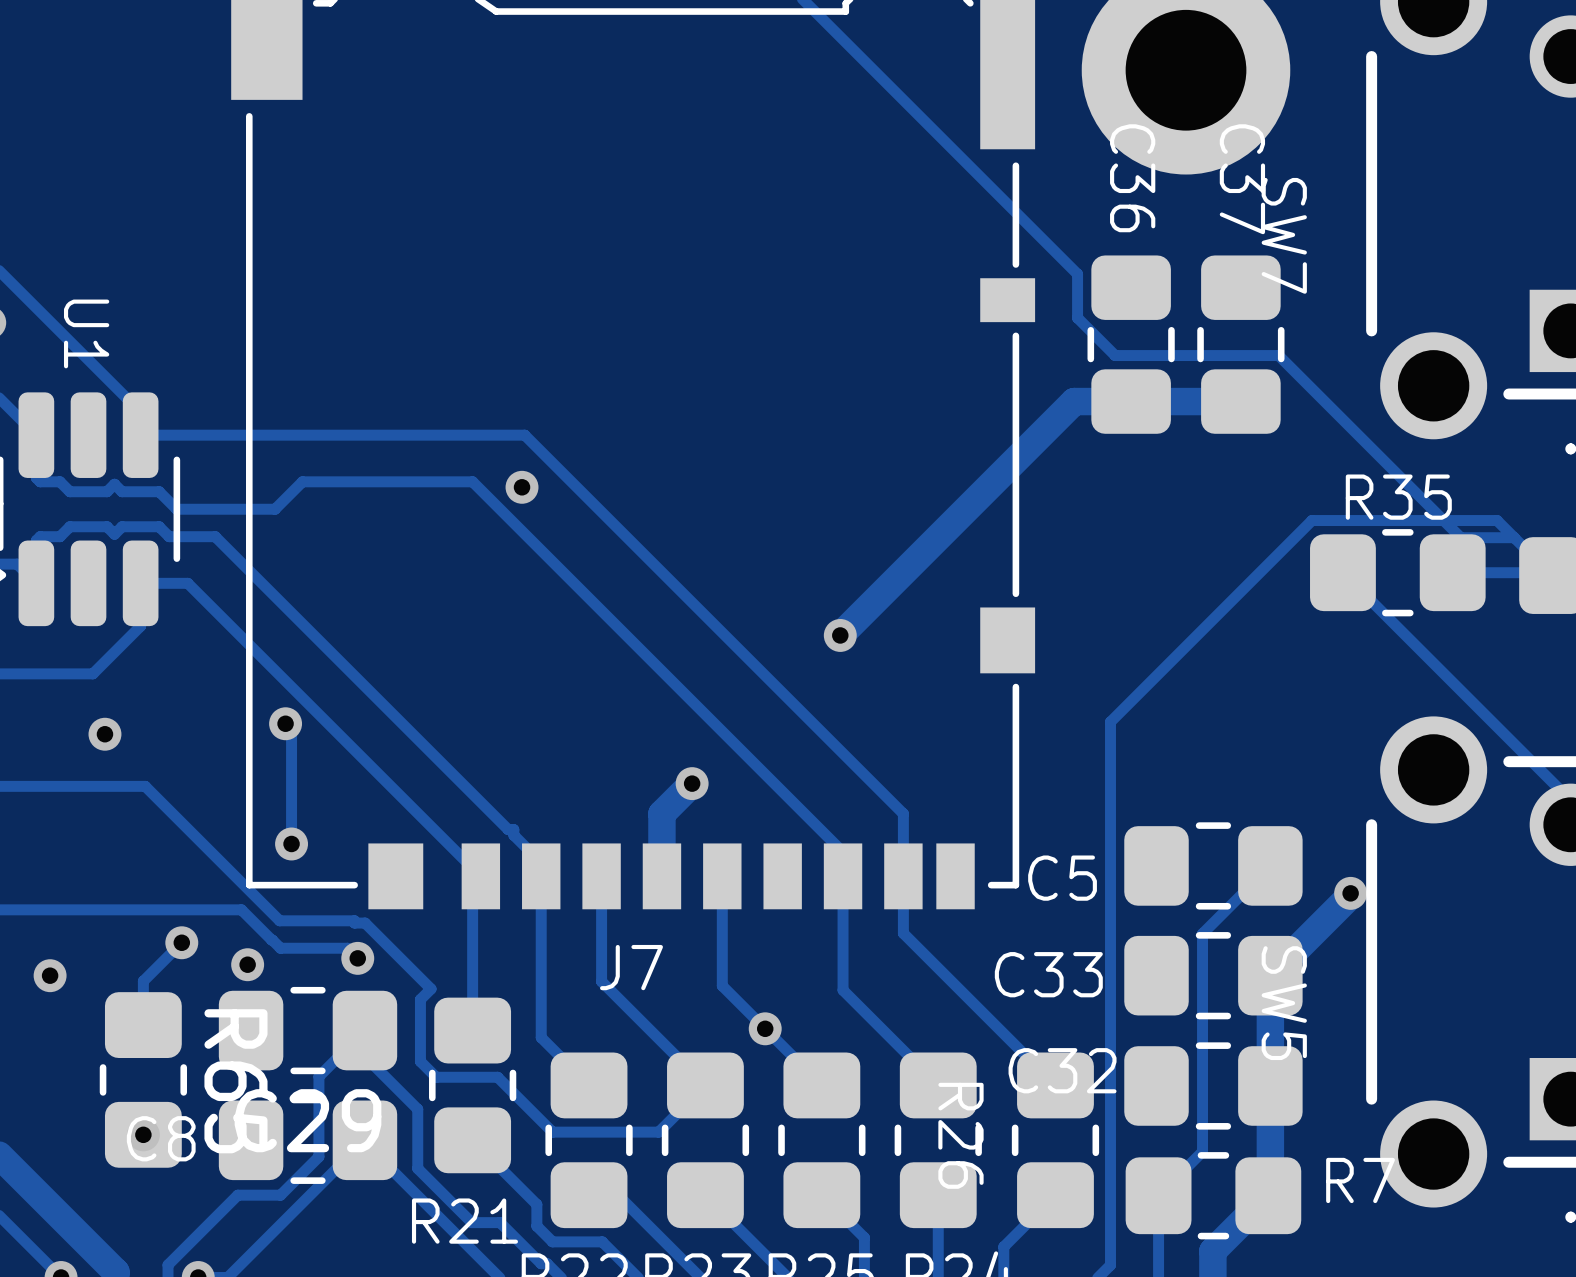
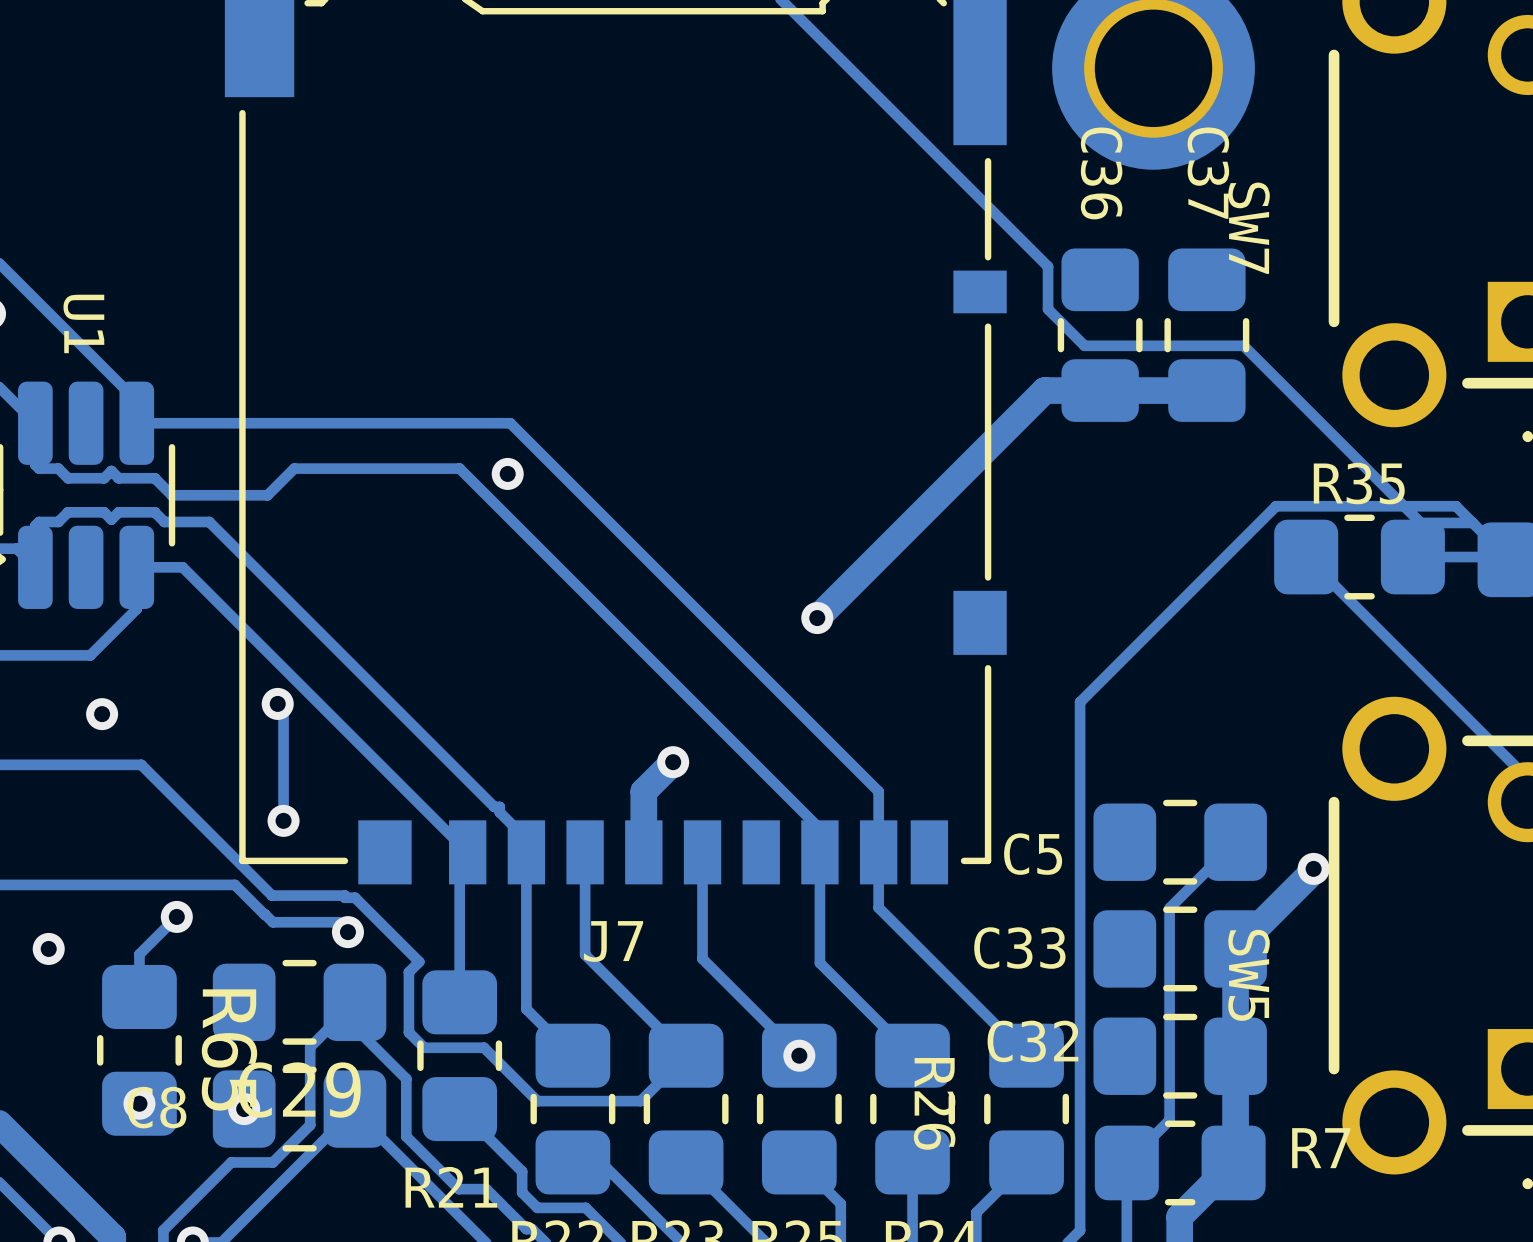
via position: (247, 964) -> (244, 1109)
via position: (765, 1028) -> (799, 1055)

